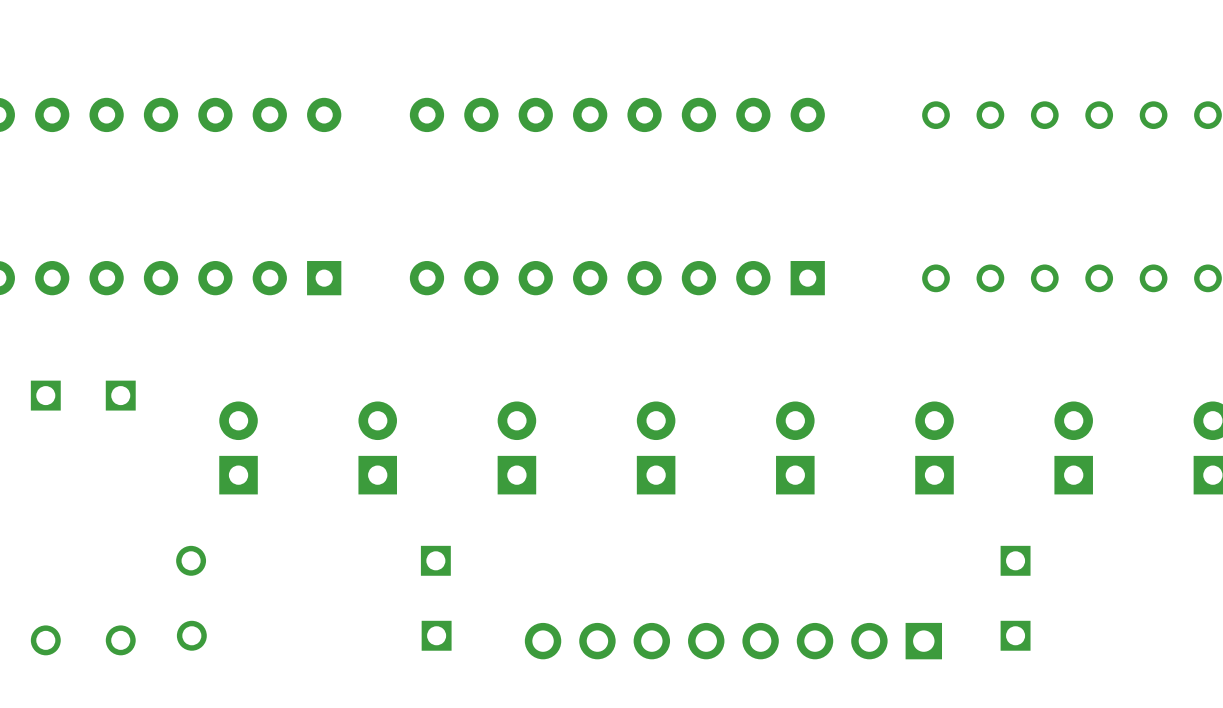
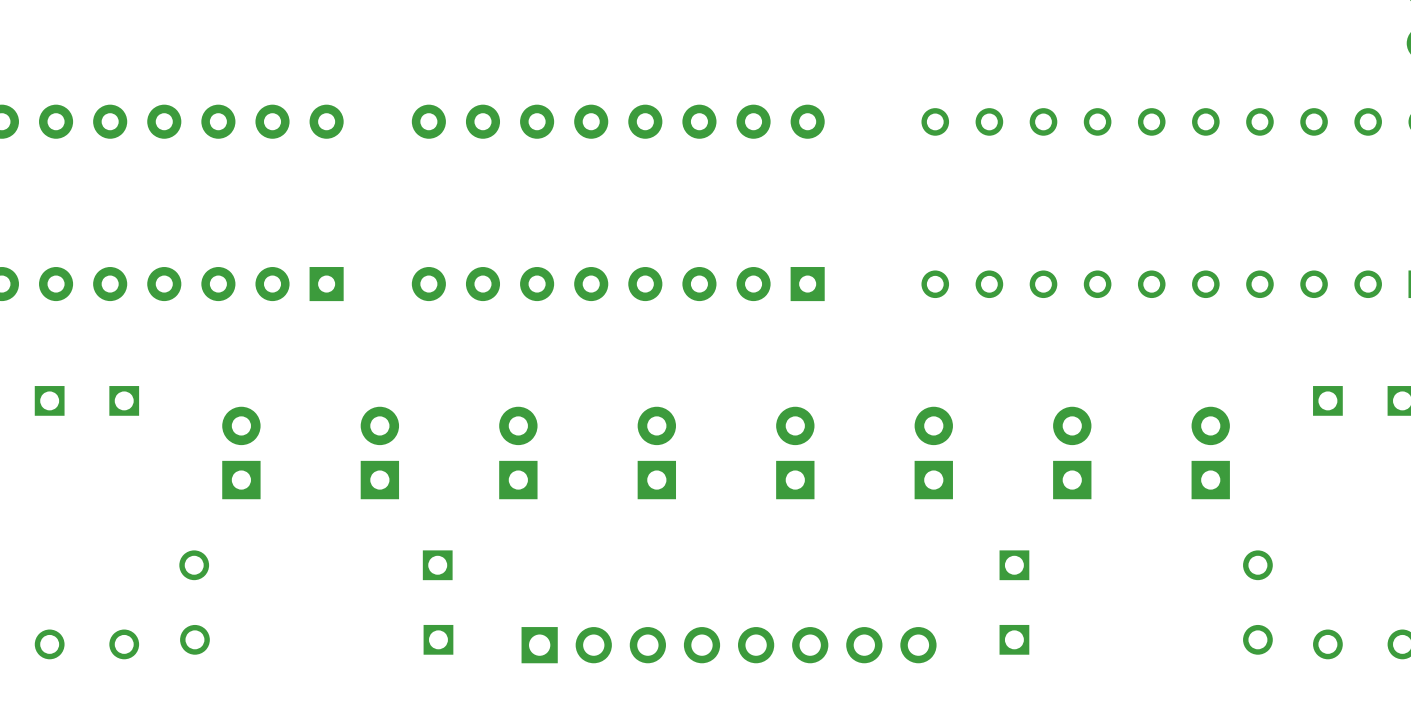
part rotation: 0° (733, 641) -> 180° (729, 645)

